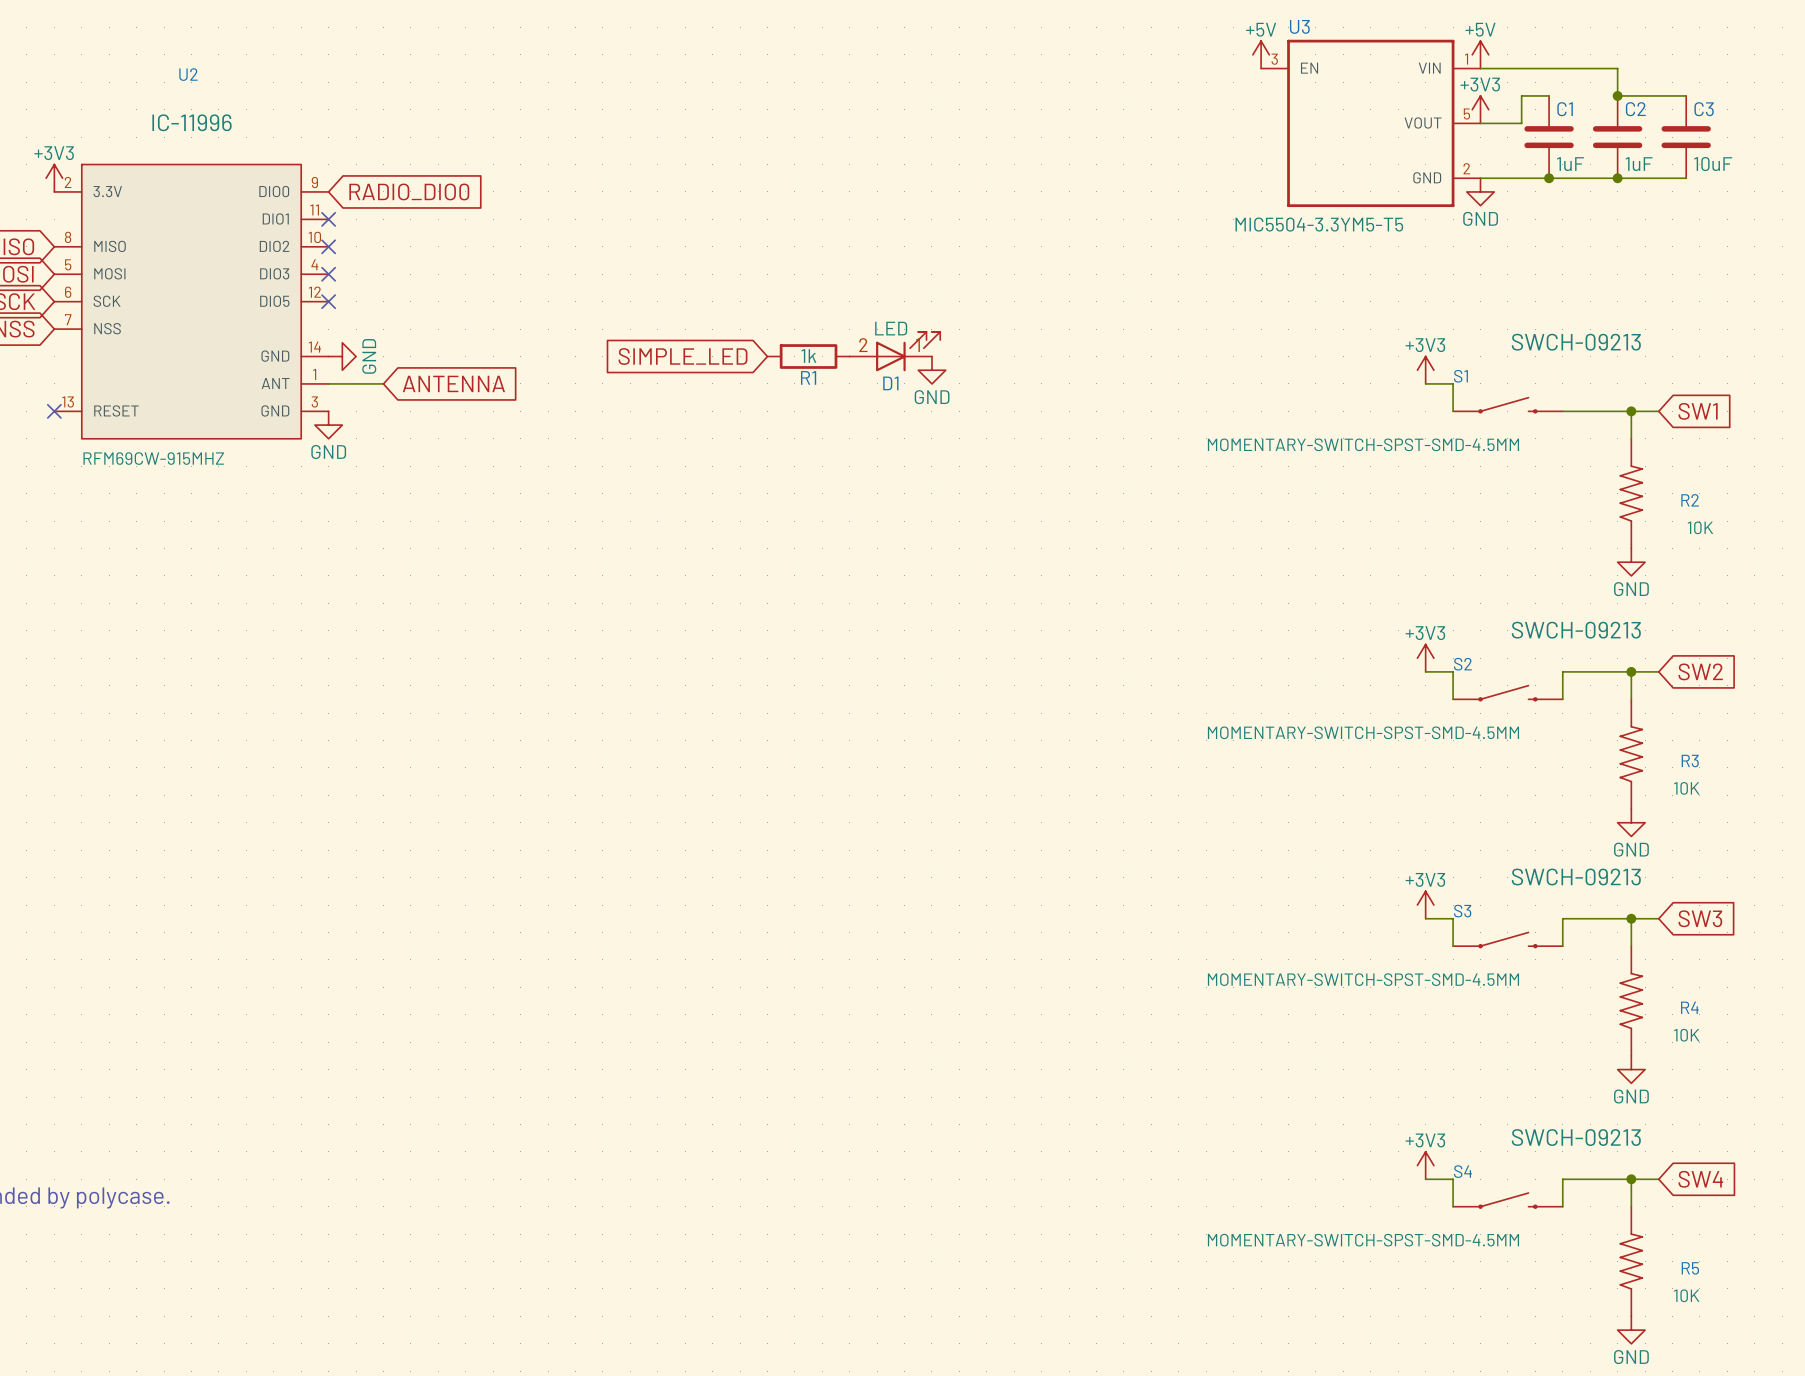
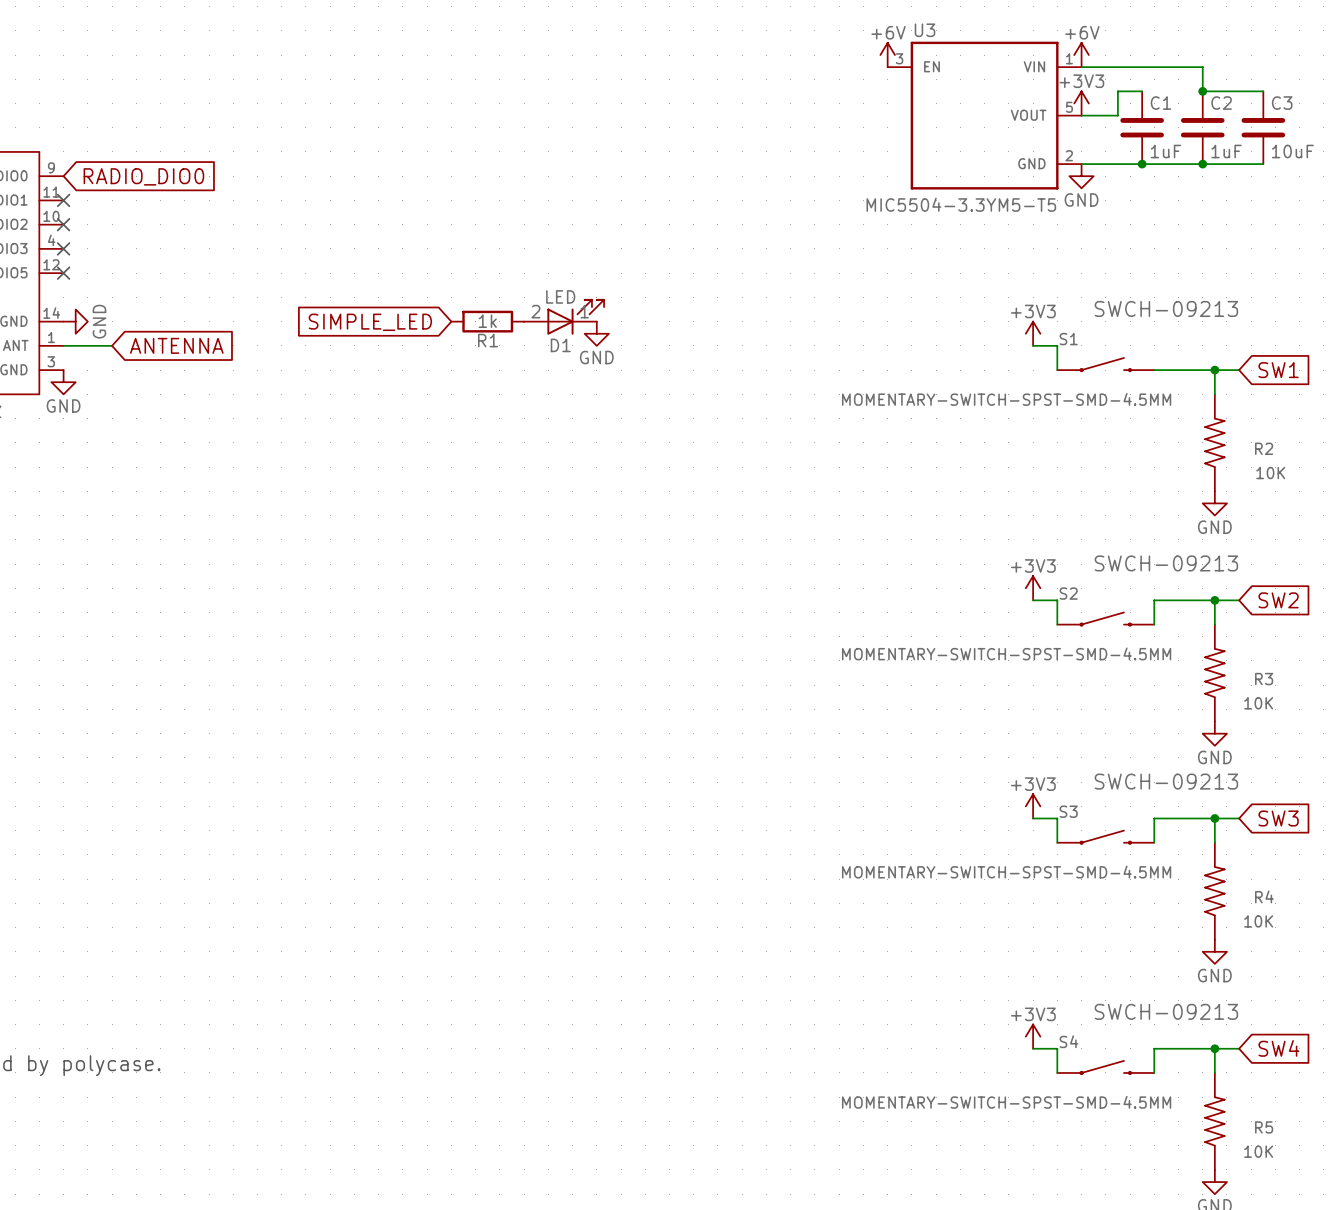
power symbol: +5V (1261, 54) -> +6V (887, 55)
power symbol: +5V (1480, 54) -> +6V (1081, 55)

